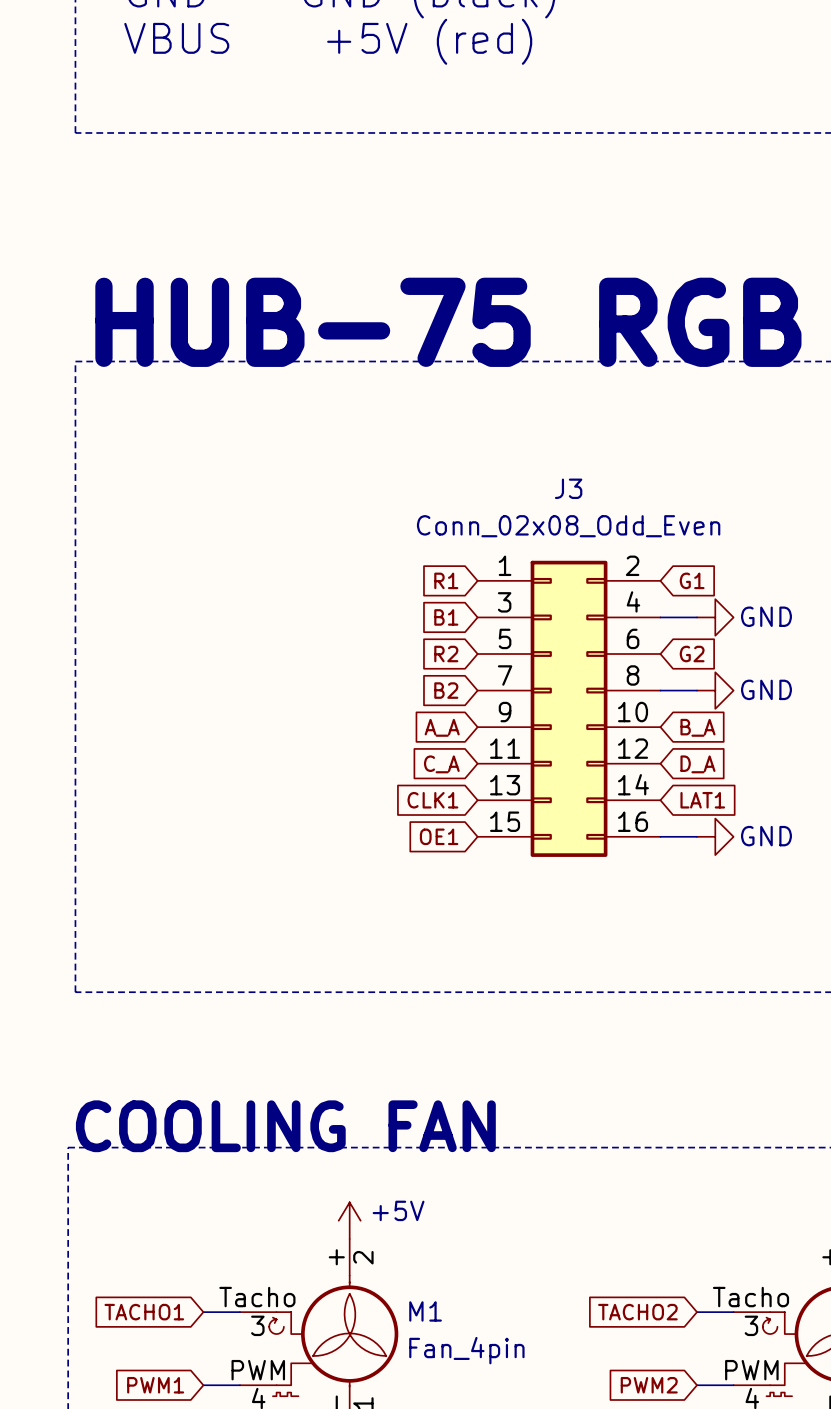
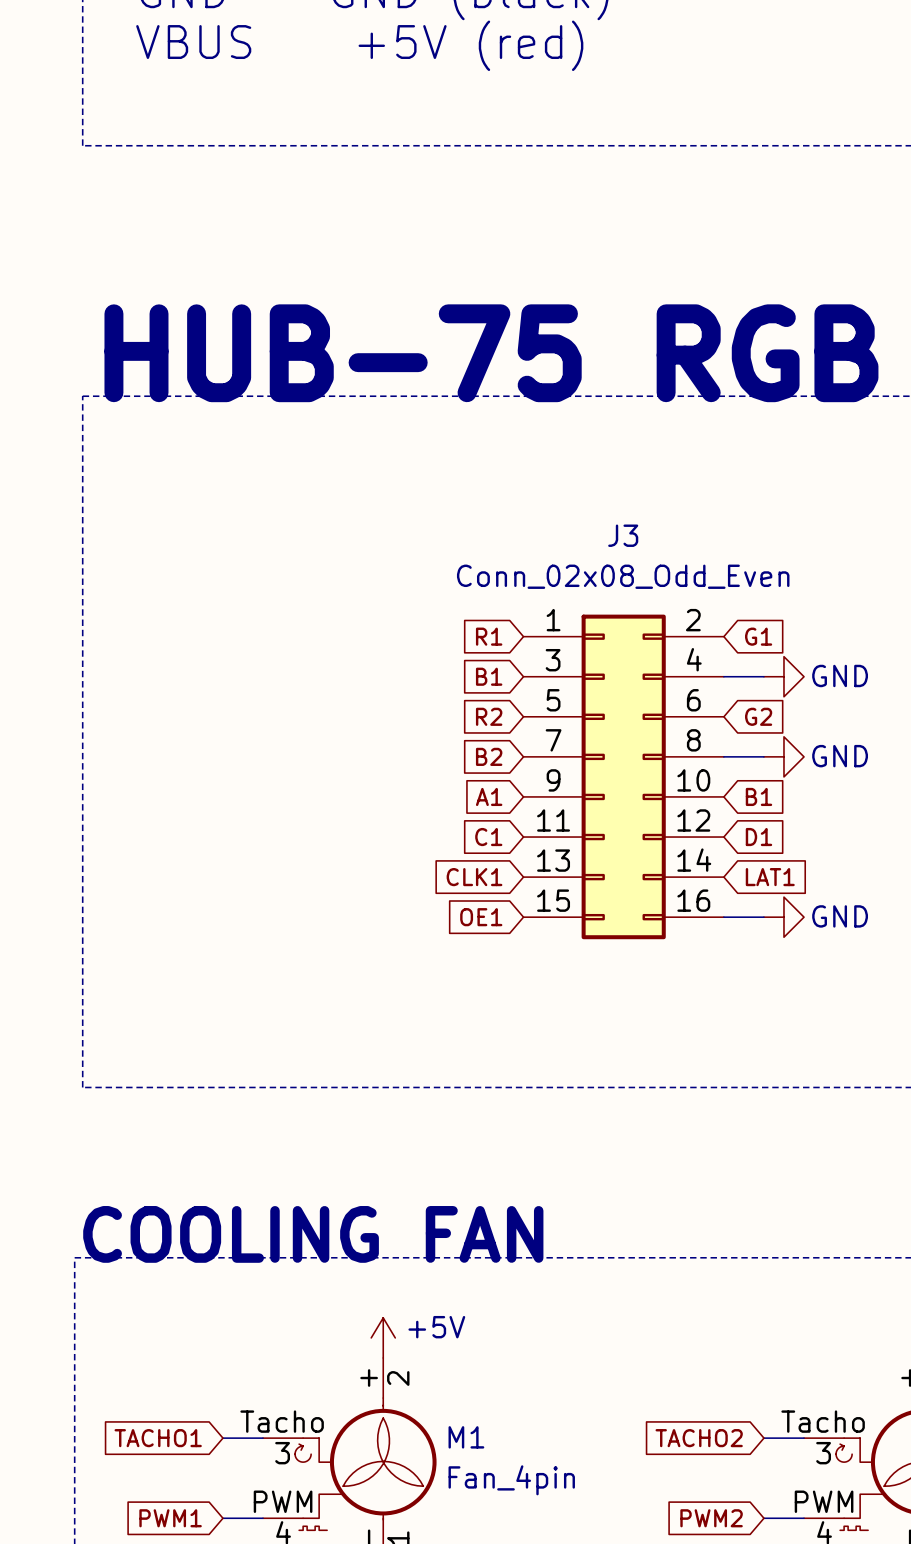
global label: A_A (442, 727) -> A1 (489, 796)
global label: B_A (697, 727) -> B1 (758, 796)
global label: C_A (441, 764) -> C1 (488, 837)
global label: D_A (697, 764) -> D1 (758, 837)

